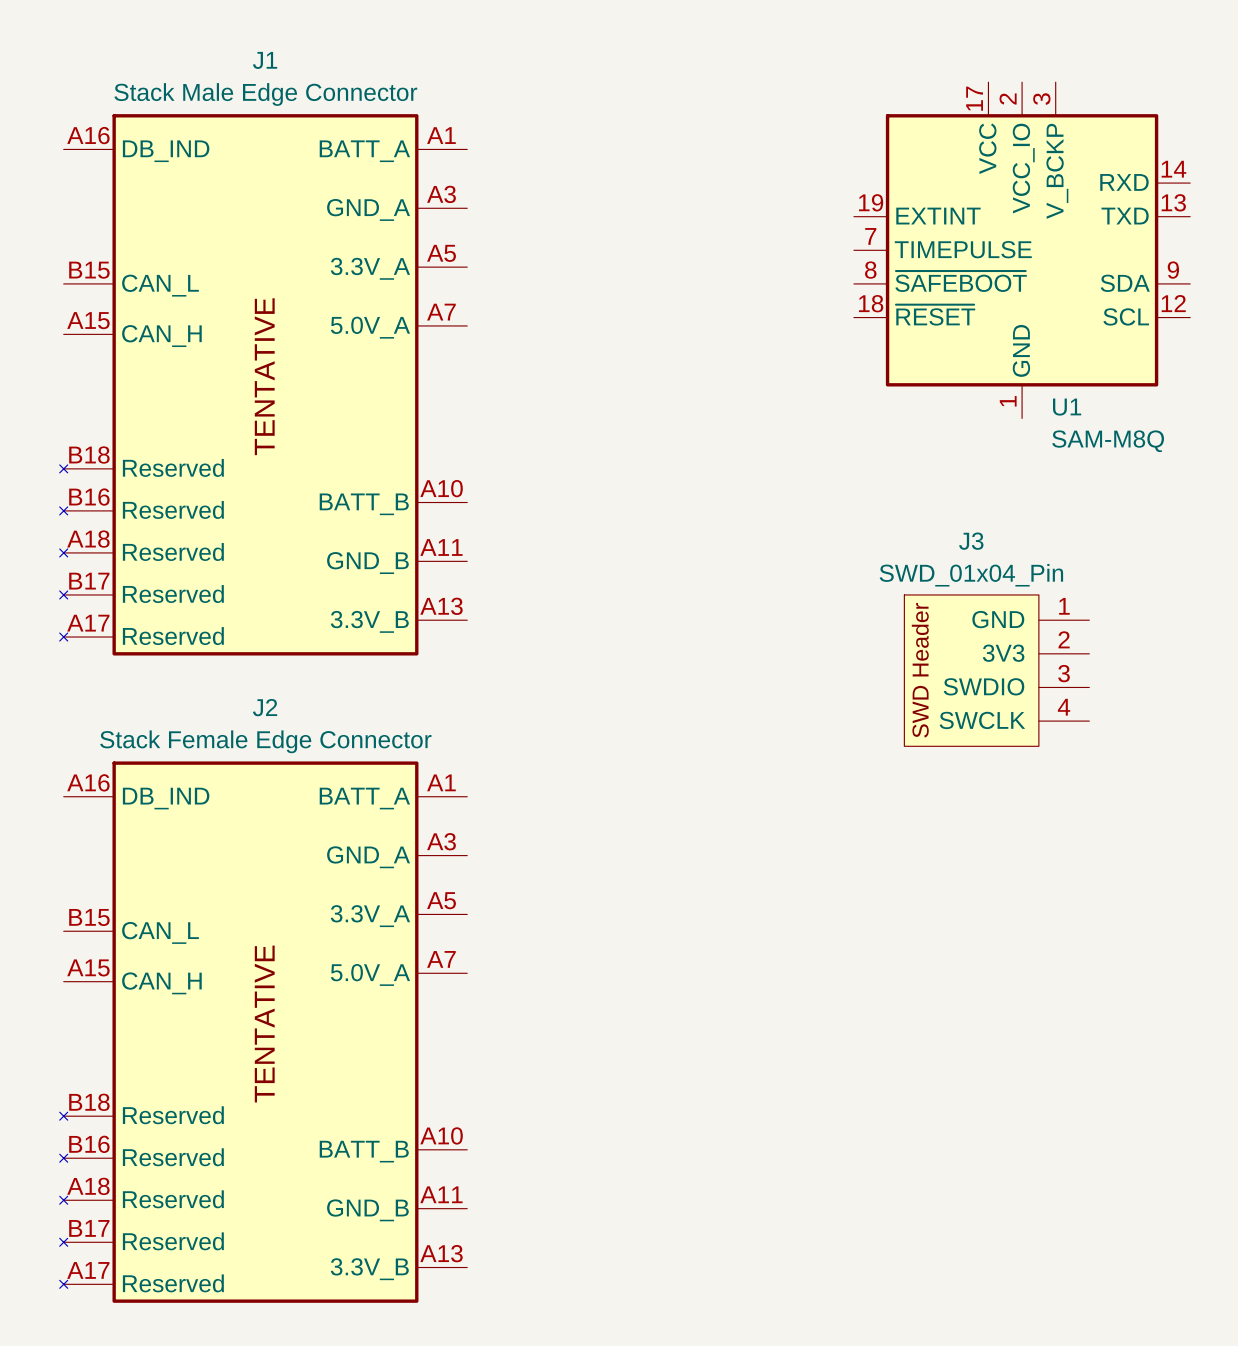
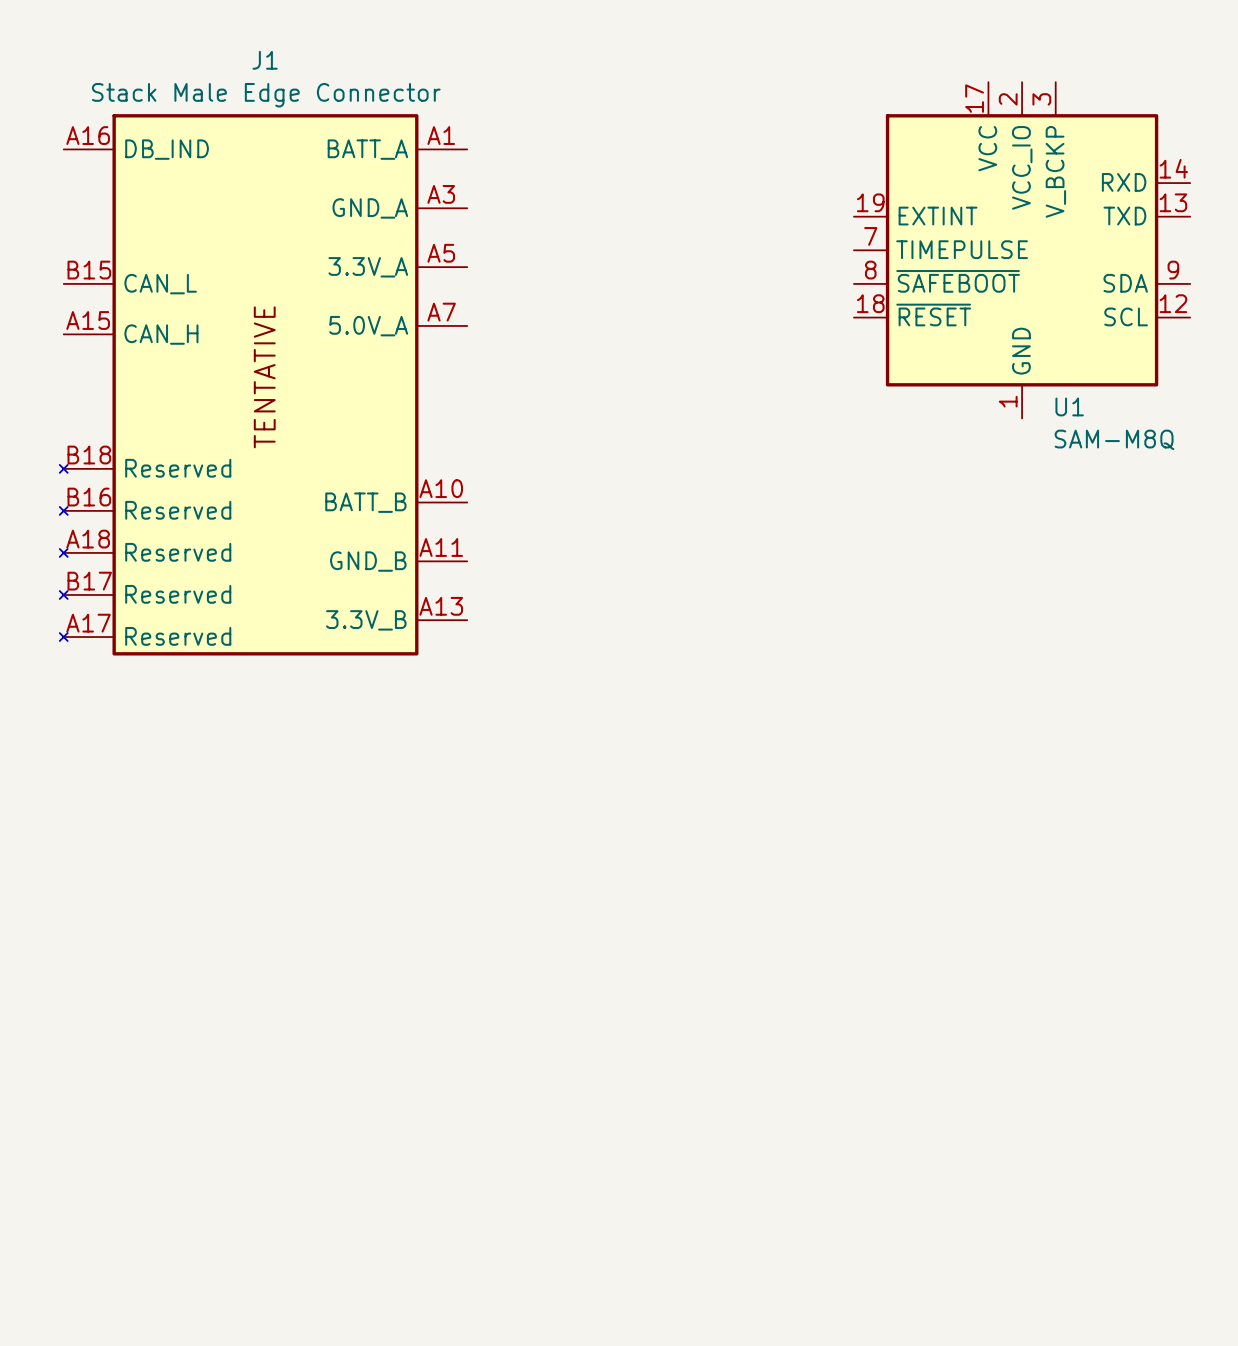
J3: SWD_01x04_Pin (996, 670) -> none
J2: Stack Female Edge Connector (263, 1032) -> none

